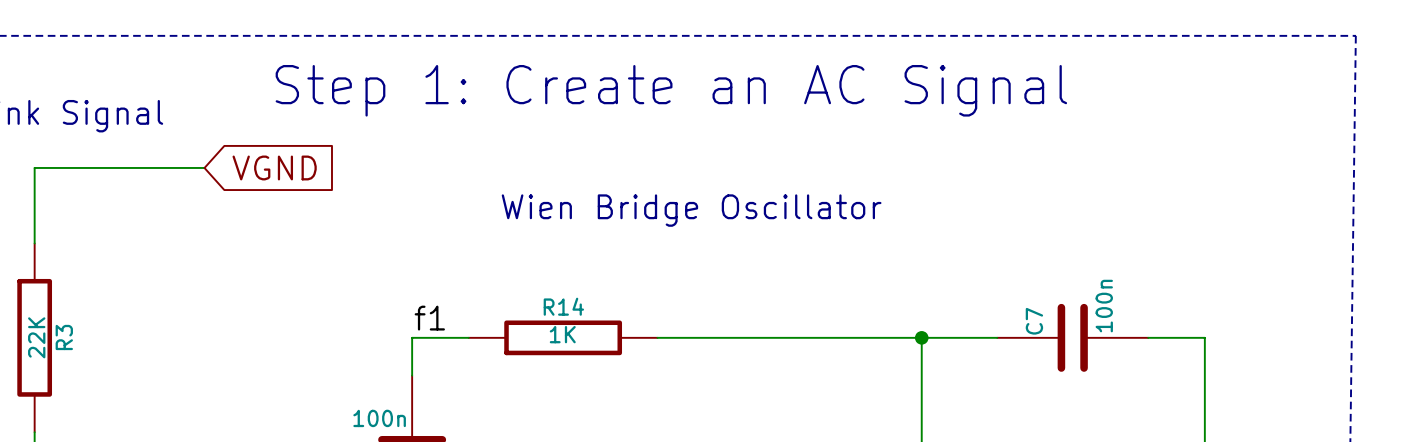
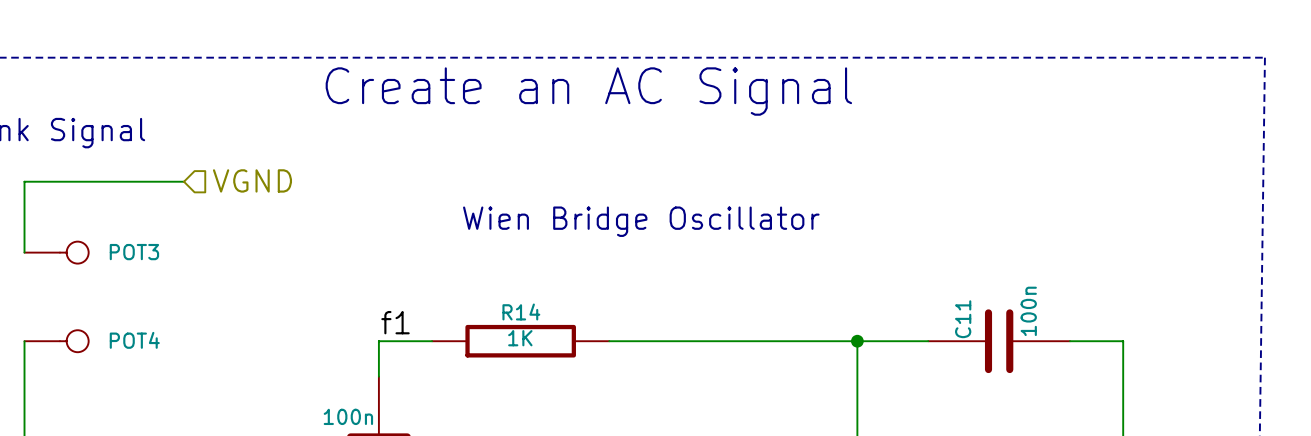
text: Step 1: Create an AC Signal (671, 90) -> Create an AC Signal (588, 91)
global label: VGND (274, 167) -> none
hierarchical label: none -> VGND (252, 180)
POT3: none -> (56, 252)
C7 name: C7 (1034, 321) -> C11 (963, 319)
wire: none -> (24, 341) (24, 429)
R3: 22K (34, 337) -> none
POT4: none -> (56, 341)

